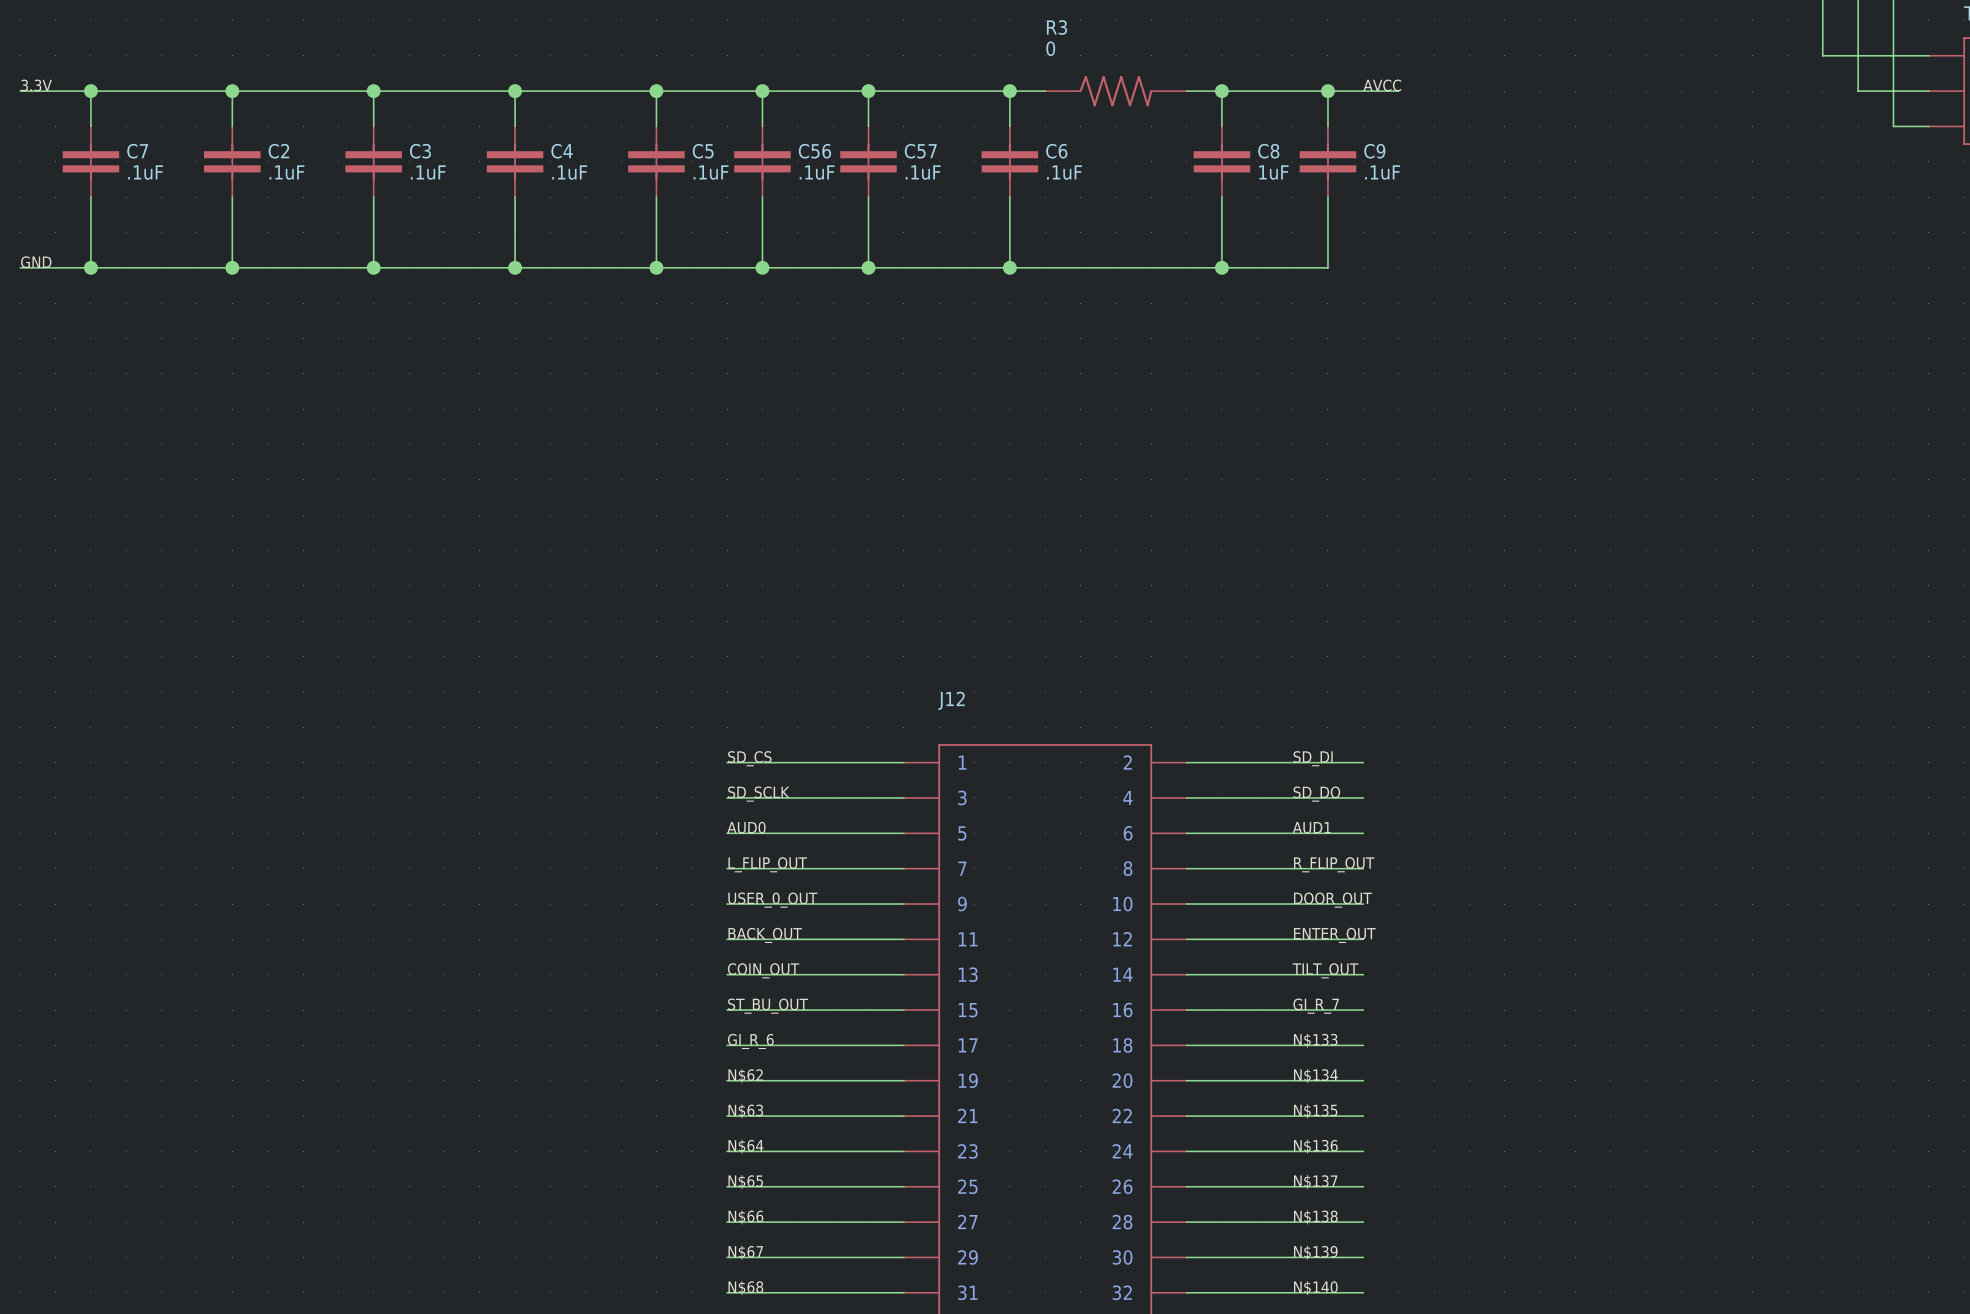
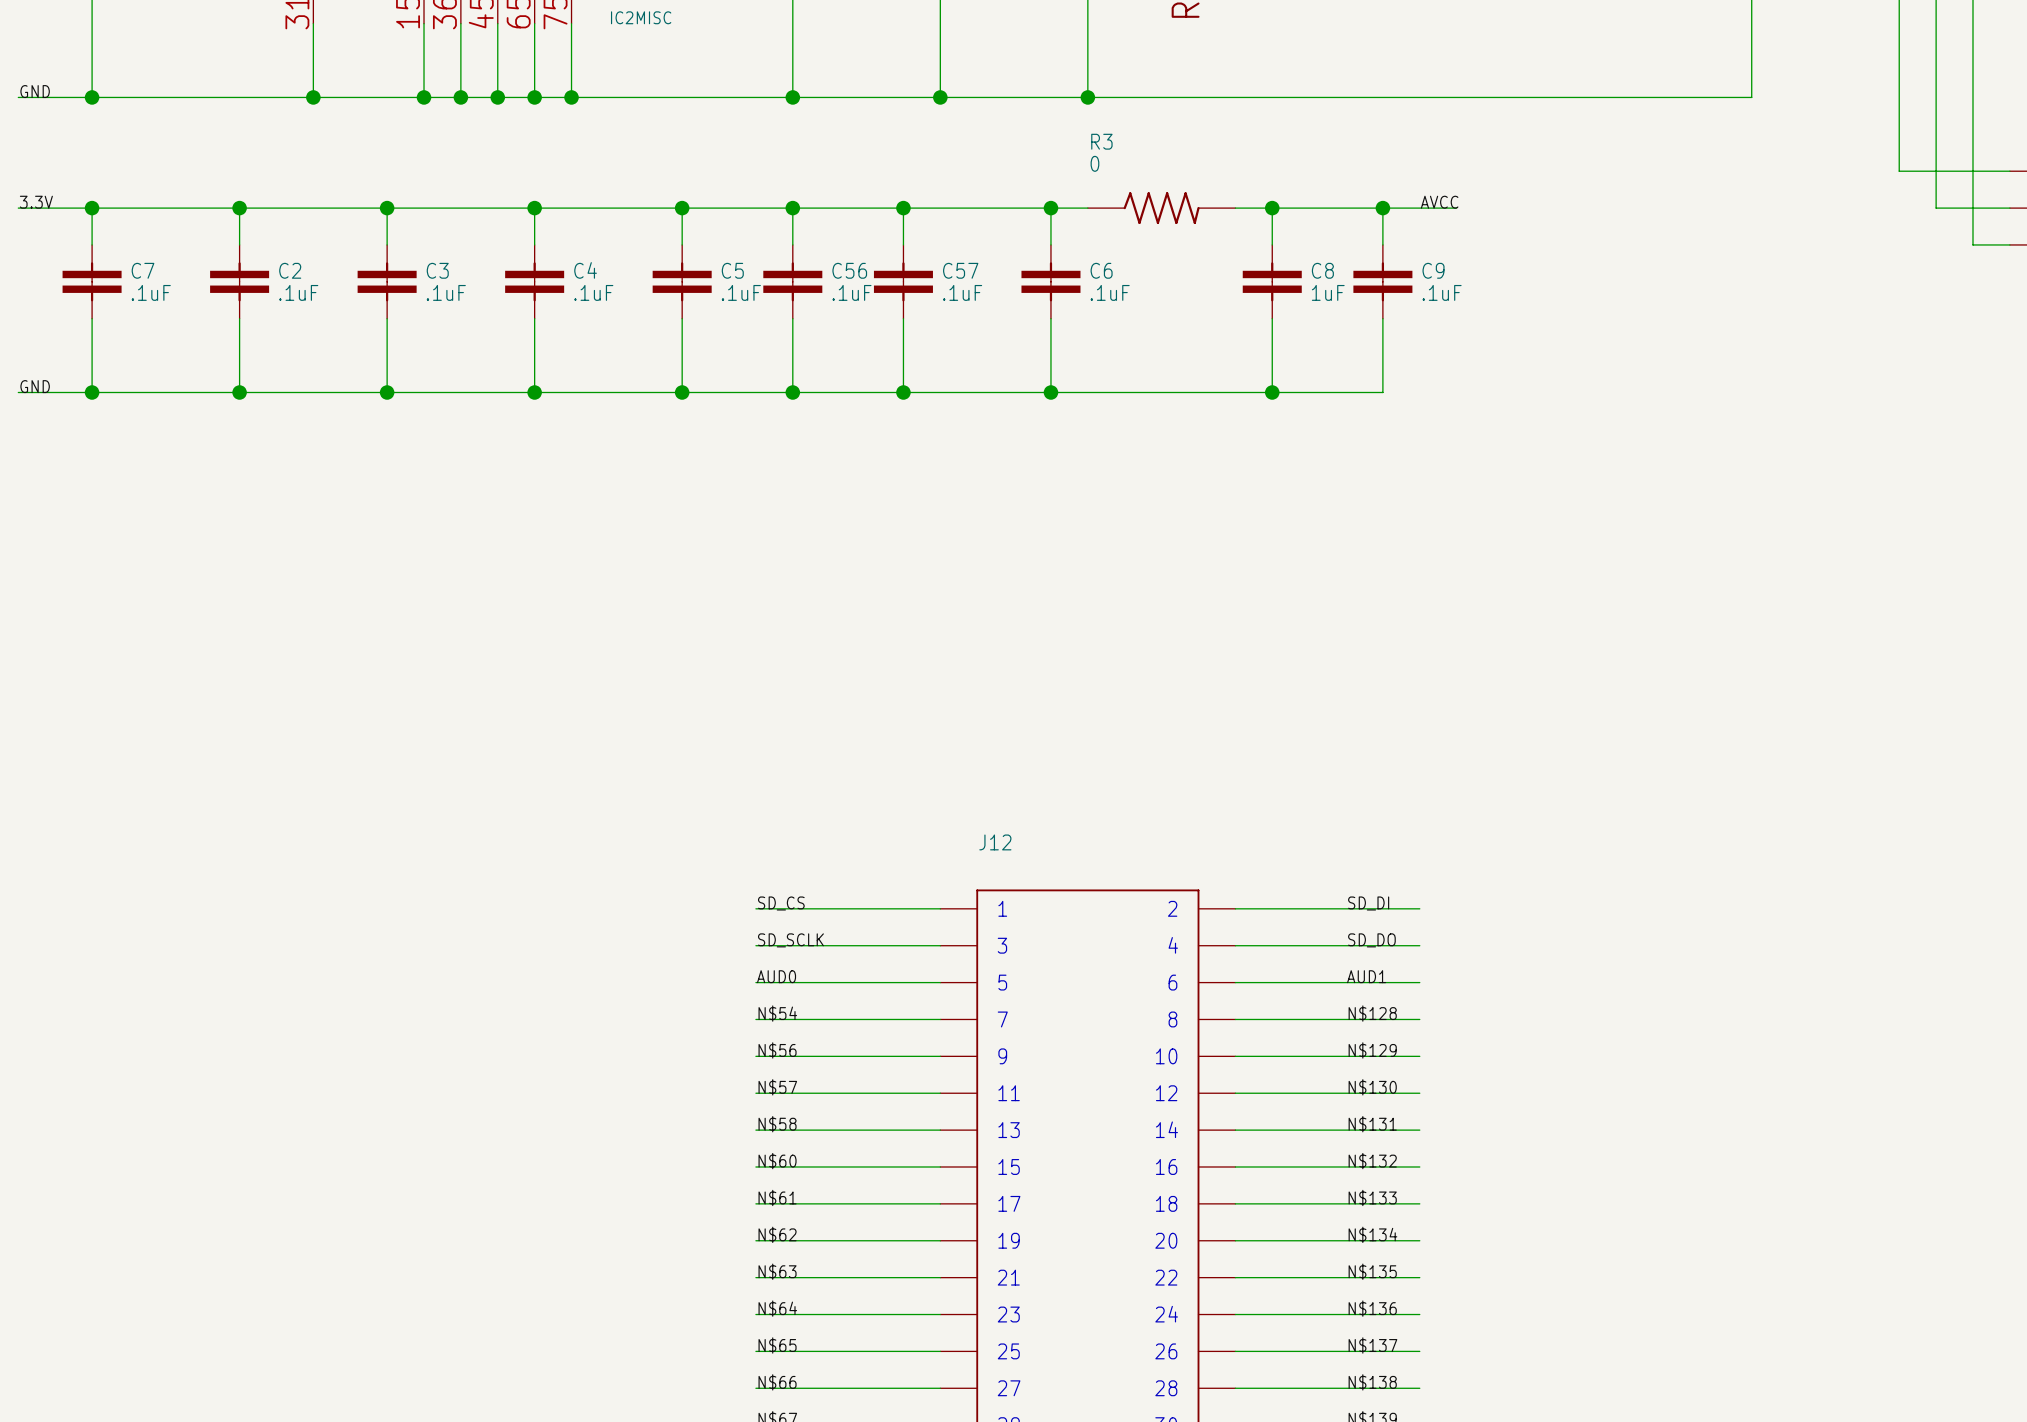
label: L_FLIP_OUT (767, 864) -> N$54 (777, 1013)
label: R_FLIP_OUT (1334, 864) -> N$128 (1372, 1013)
label: USER_0_OUT (772, 900) -> N$56 (777, 1050)
label: DOOR_OUT (1332, 900) -> N$129 (1372, 1050)
label: BACK_OUT (765, 935) -> N$57 (777, 1087)
label: ENTER_OUT (1334, 935) -> N$130 (1372, 1087)
label: COIN_OUT (763, 970) -> N$58 (777, 1124)
label: TILT_OUT (1325, 970) -> N$131 (1372, 1124)
label: ST_BU_OUT (768, 1006) -> N$60 (777, 1161)
label: GI_R_7 (1316, 1006) -> N$132 (1372, 1161)
label: GI_R_6 (750, 1041) -> N$61 (777, 1197)

